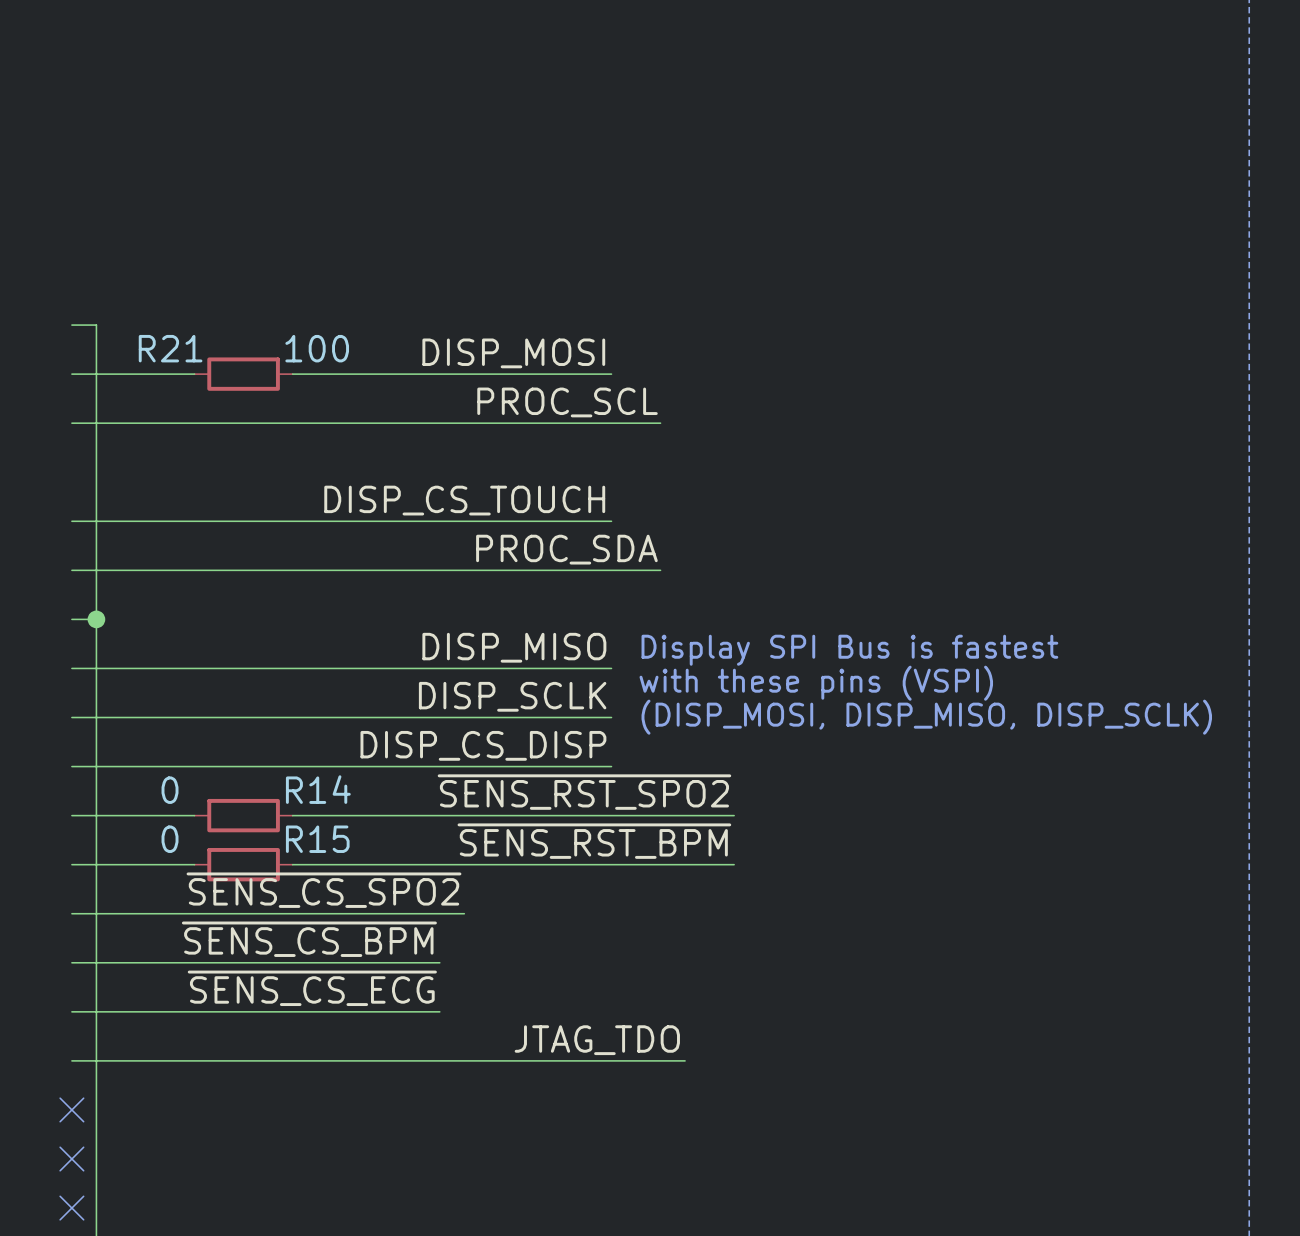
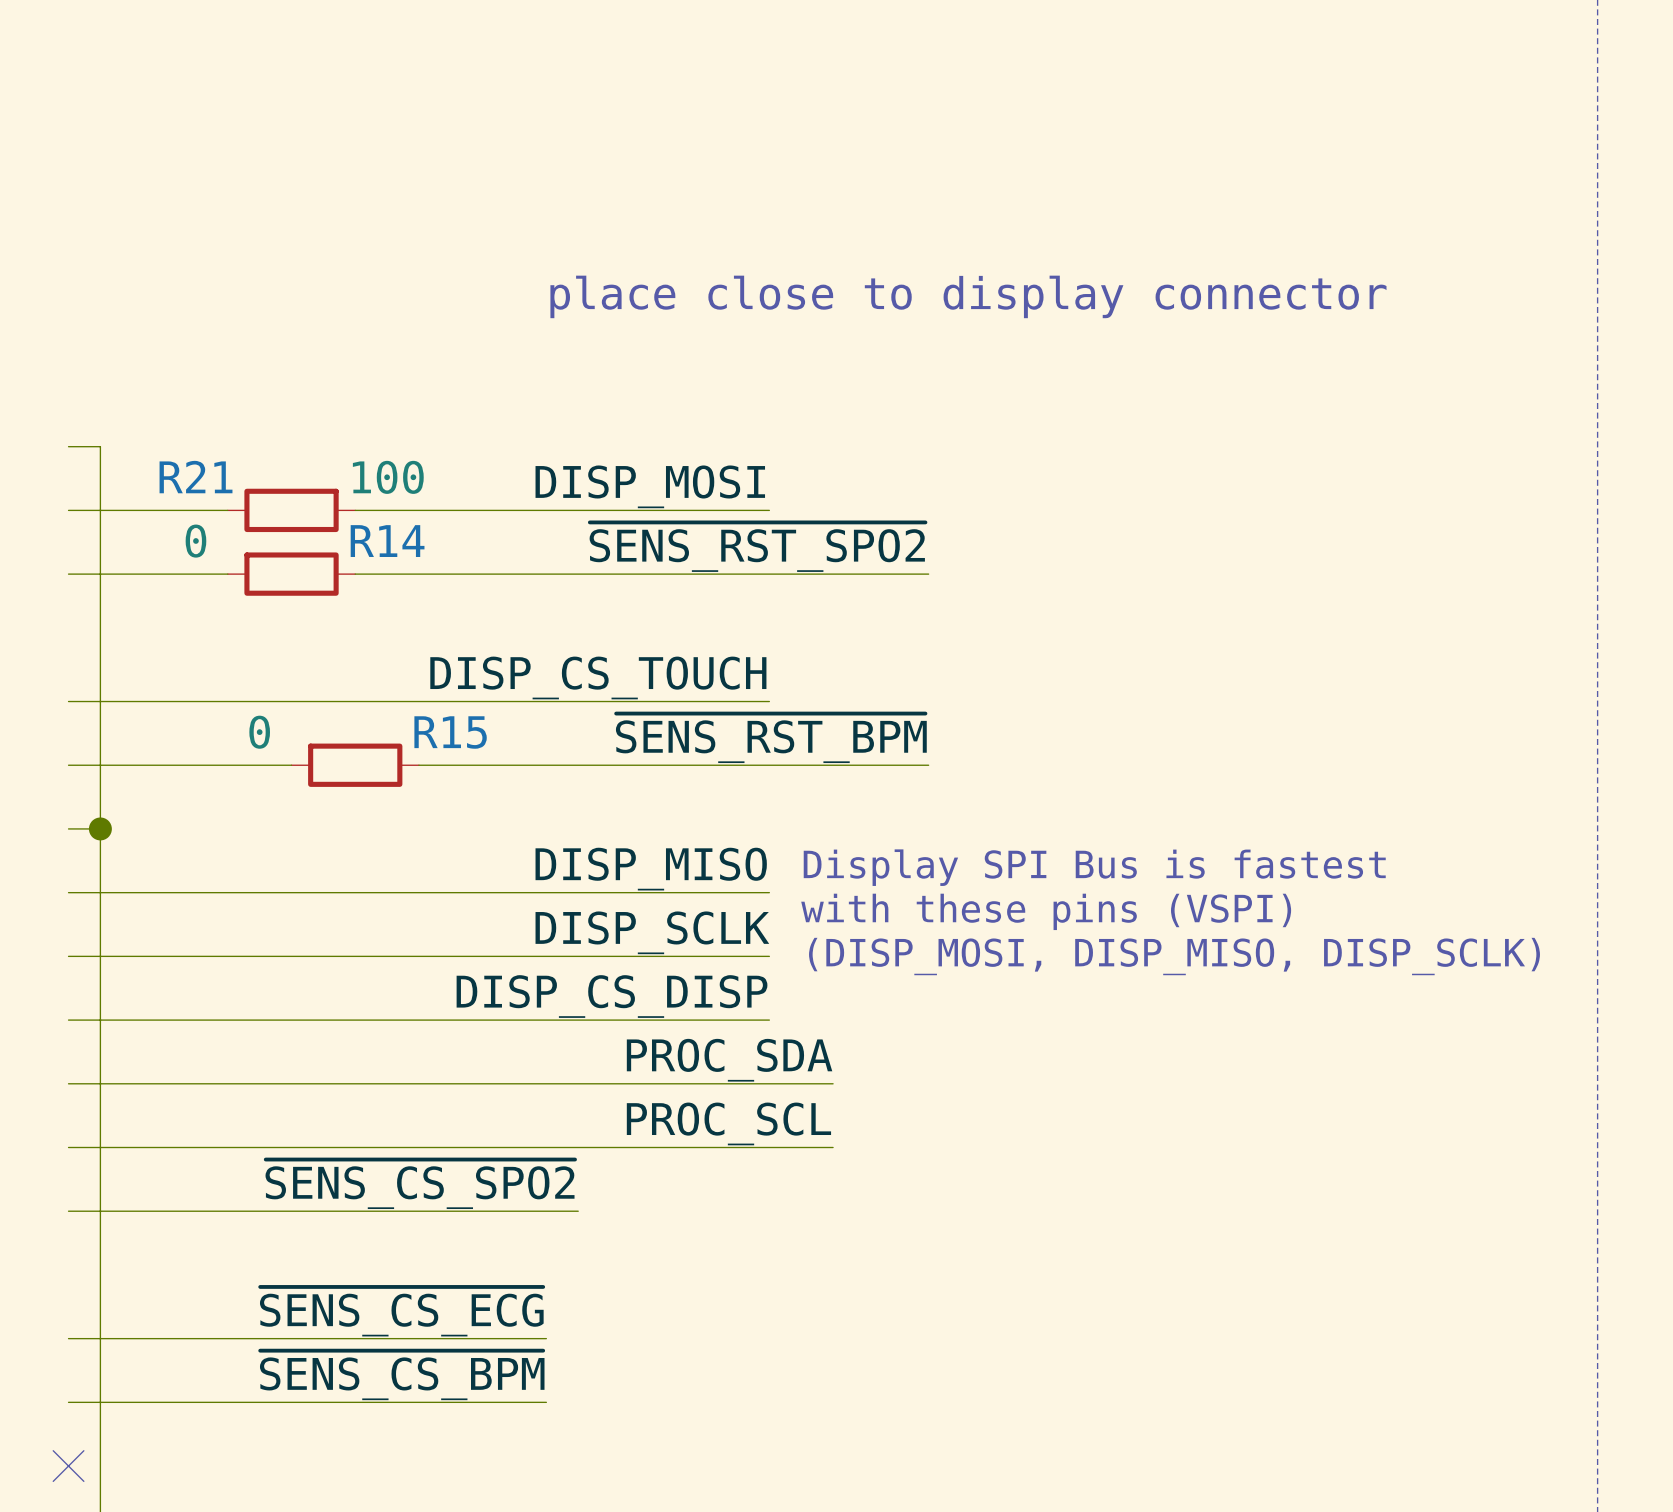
text: none -> place close to display connector (968, 296)
label position: PROC_SCL (567, 402) -> PROC_SCL (728, 1123)
wire: (194, 423) (292, 423) -> (227, 1147) (355, 1147)
label position: PROC_SDA (566, 549) -> PROC_SDA (729, 1060)
wire: (243, 570) (341, 570) -> (227, 1083) (355, 1083)
label position: ~{SENS_RST_SPO2} (584, 792) -> ~{SENS_RST_SPO2} (757, 547)
R14 position: (243, 815) -> (291, 574)
wire: (660, 815) (734, 815) -> (833, 765) (928, 765)
label position: ~{SENS_RST_BPM} (594, 841) -> ~{SENS_RST_BPM} (771, 738)
R15 position: (243, 864) -> (355, 765)
wire: (660, 864) (734, 864) -> (833, 574) (928, 574)
label position: ~{SENS_CS_BPM} (309, 939) -> ~{SENS_CS_BPM} (402, 1375)
wire: (71, 962) (439, 962) -> none
label: JTAG_TDO (597, 1040) -> none
wire: (439, 1060) (685, 1060) -> none

